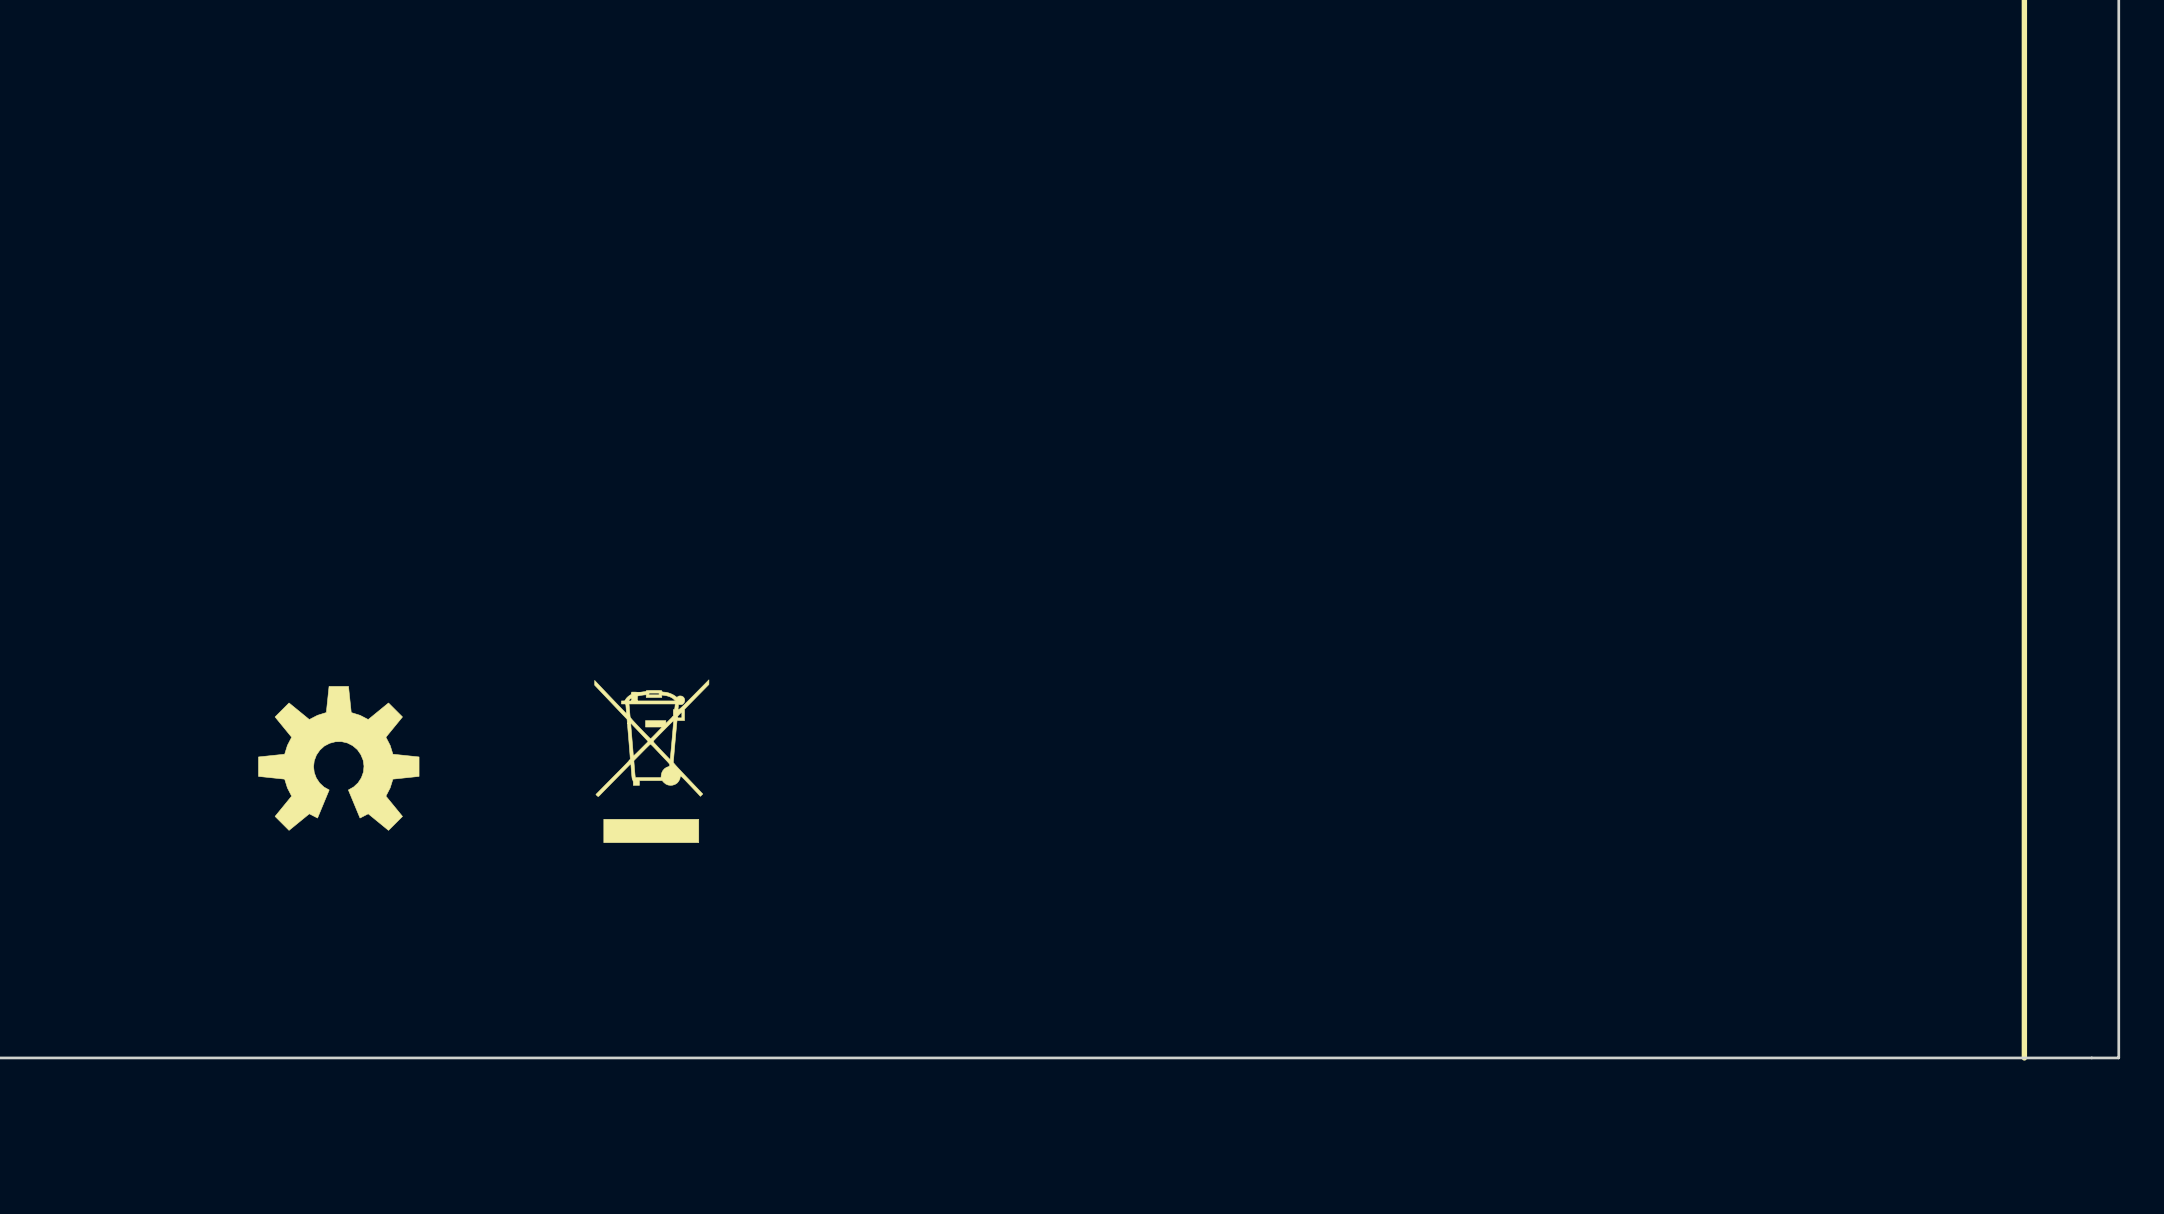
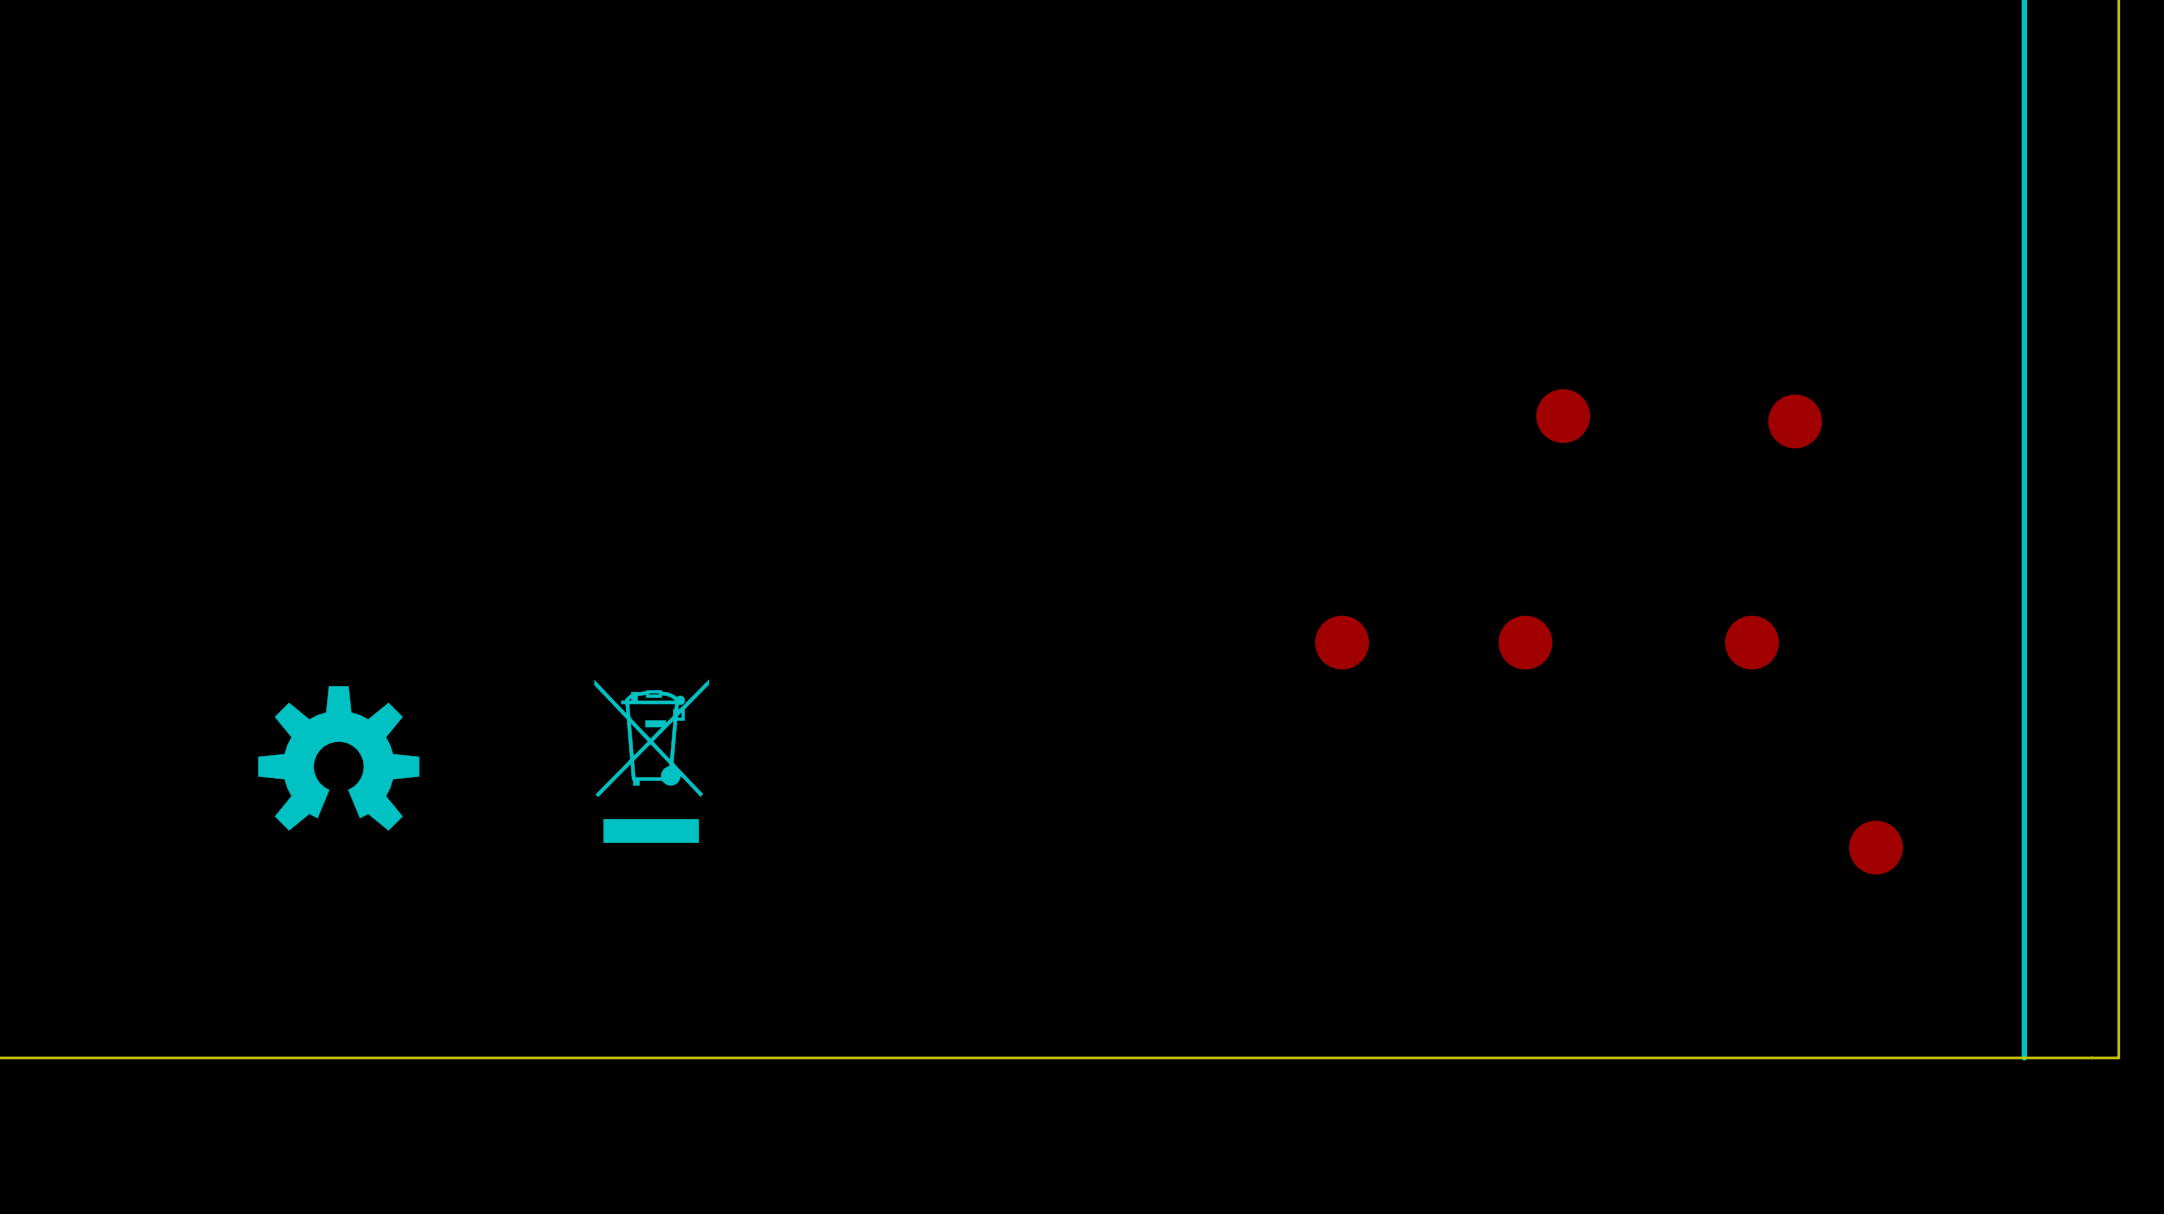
part: none -> (1563, 416)
part: none -> (1795, 421)
part: none -> (1342, 642)
part: none -> (1525, 642)
part: none -> (1751, 642)
part: none -> (1876, 847)

